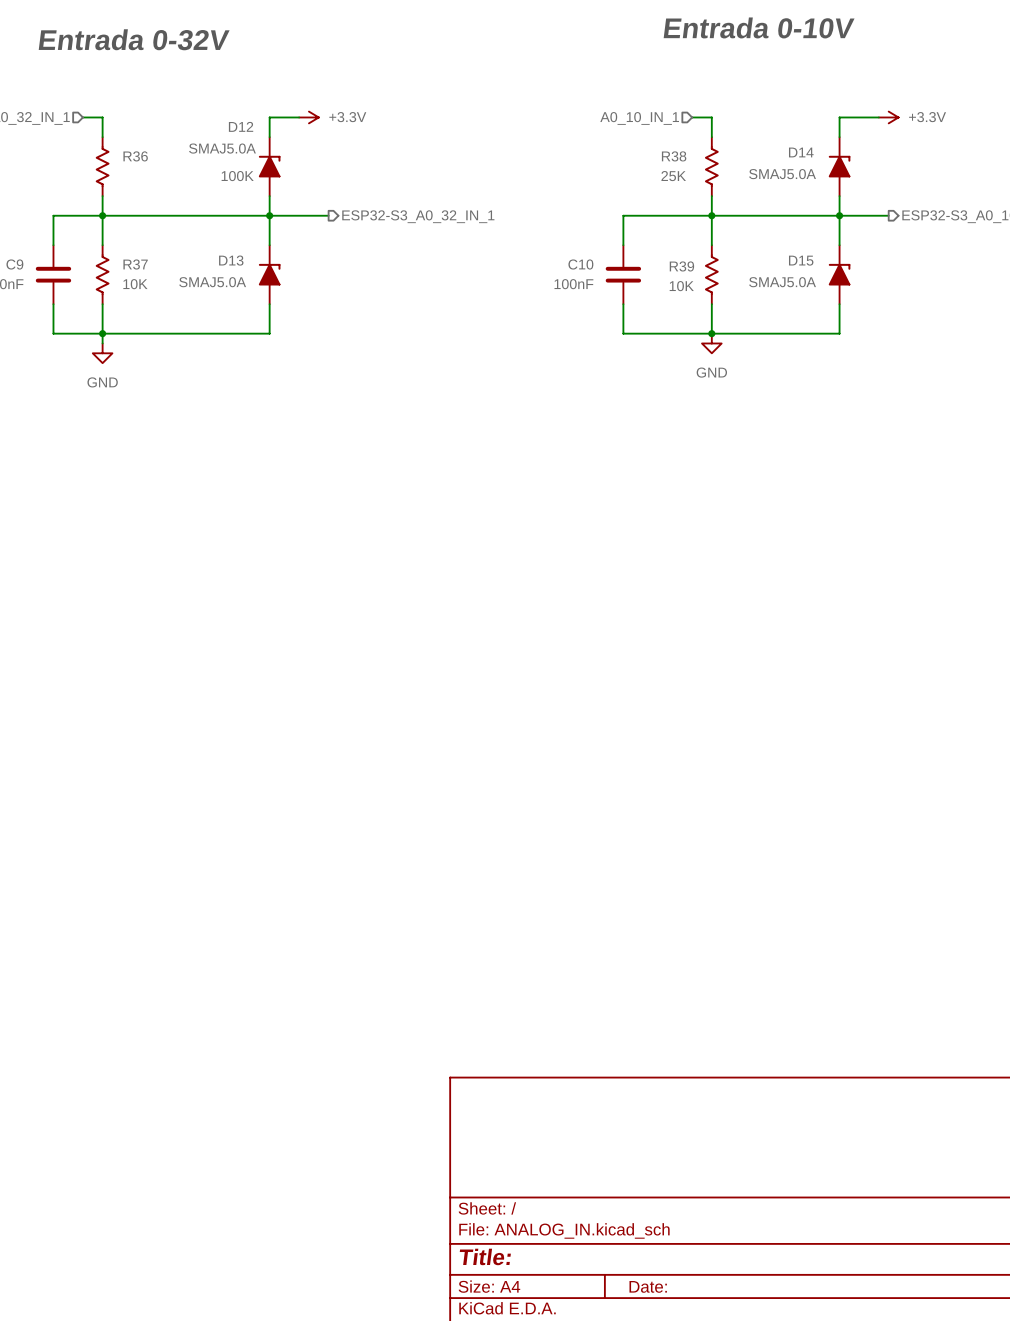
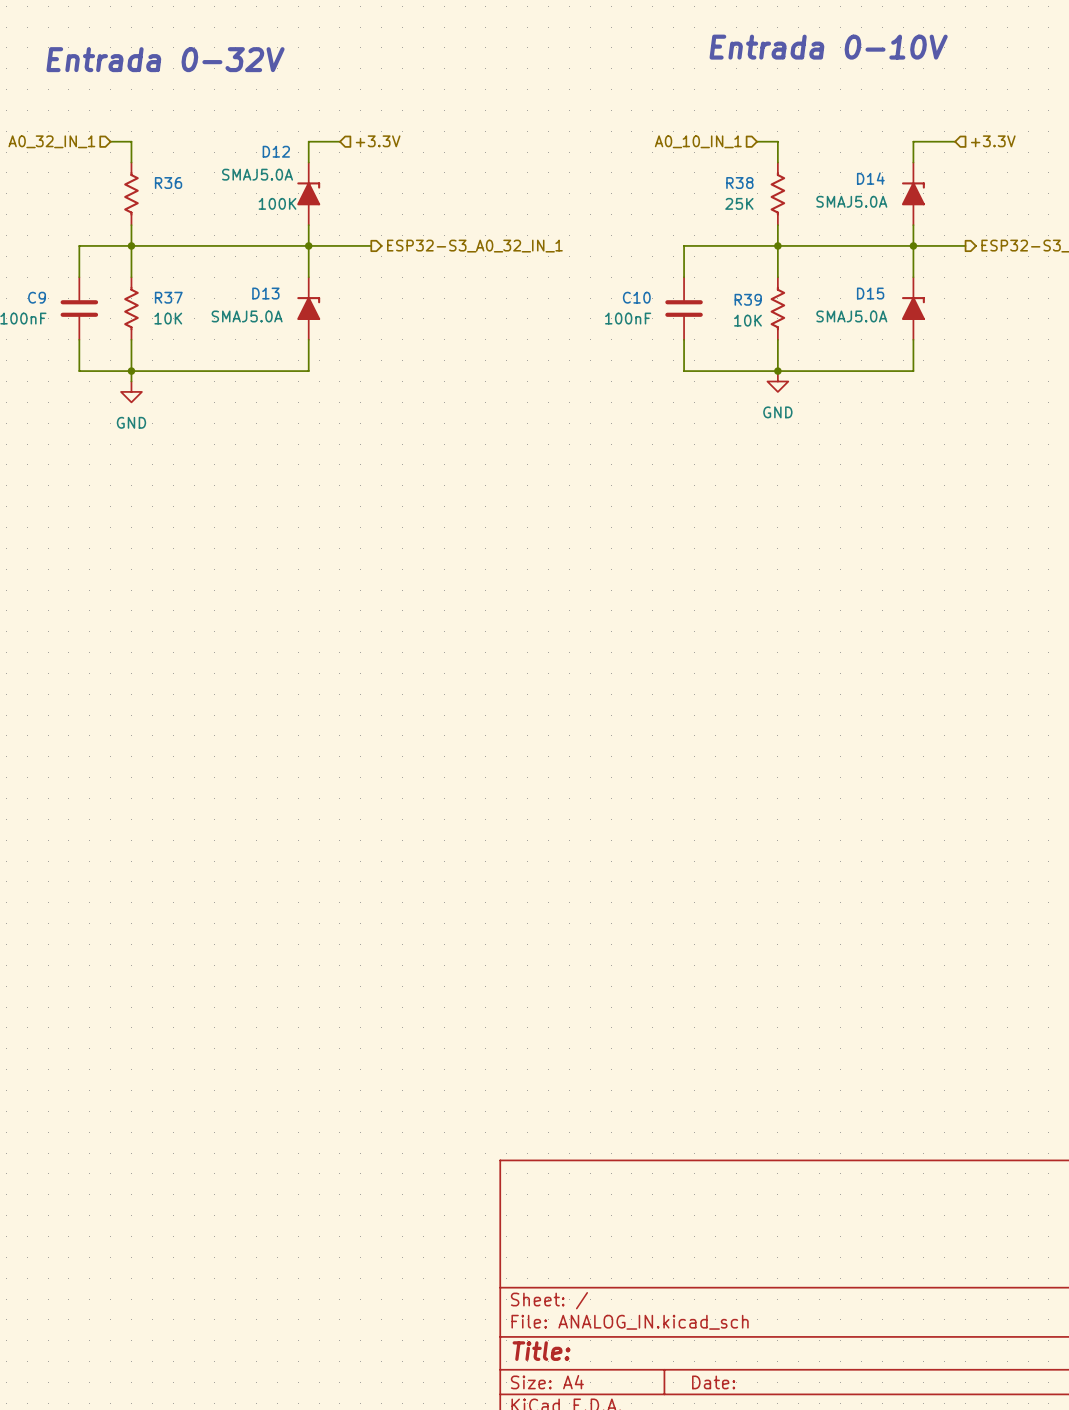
power symbol: +3.3V (308, 117) -> none
hierarchical label: none -> +3.3V (378, 141)
power symbol: +3.3V (888, 117) -> none
hierarchical label: none -> +3.3V (993, 141)

